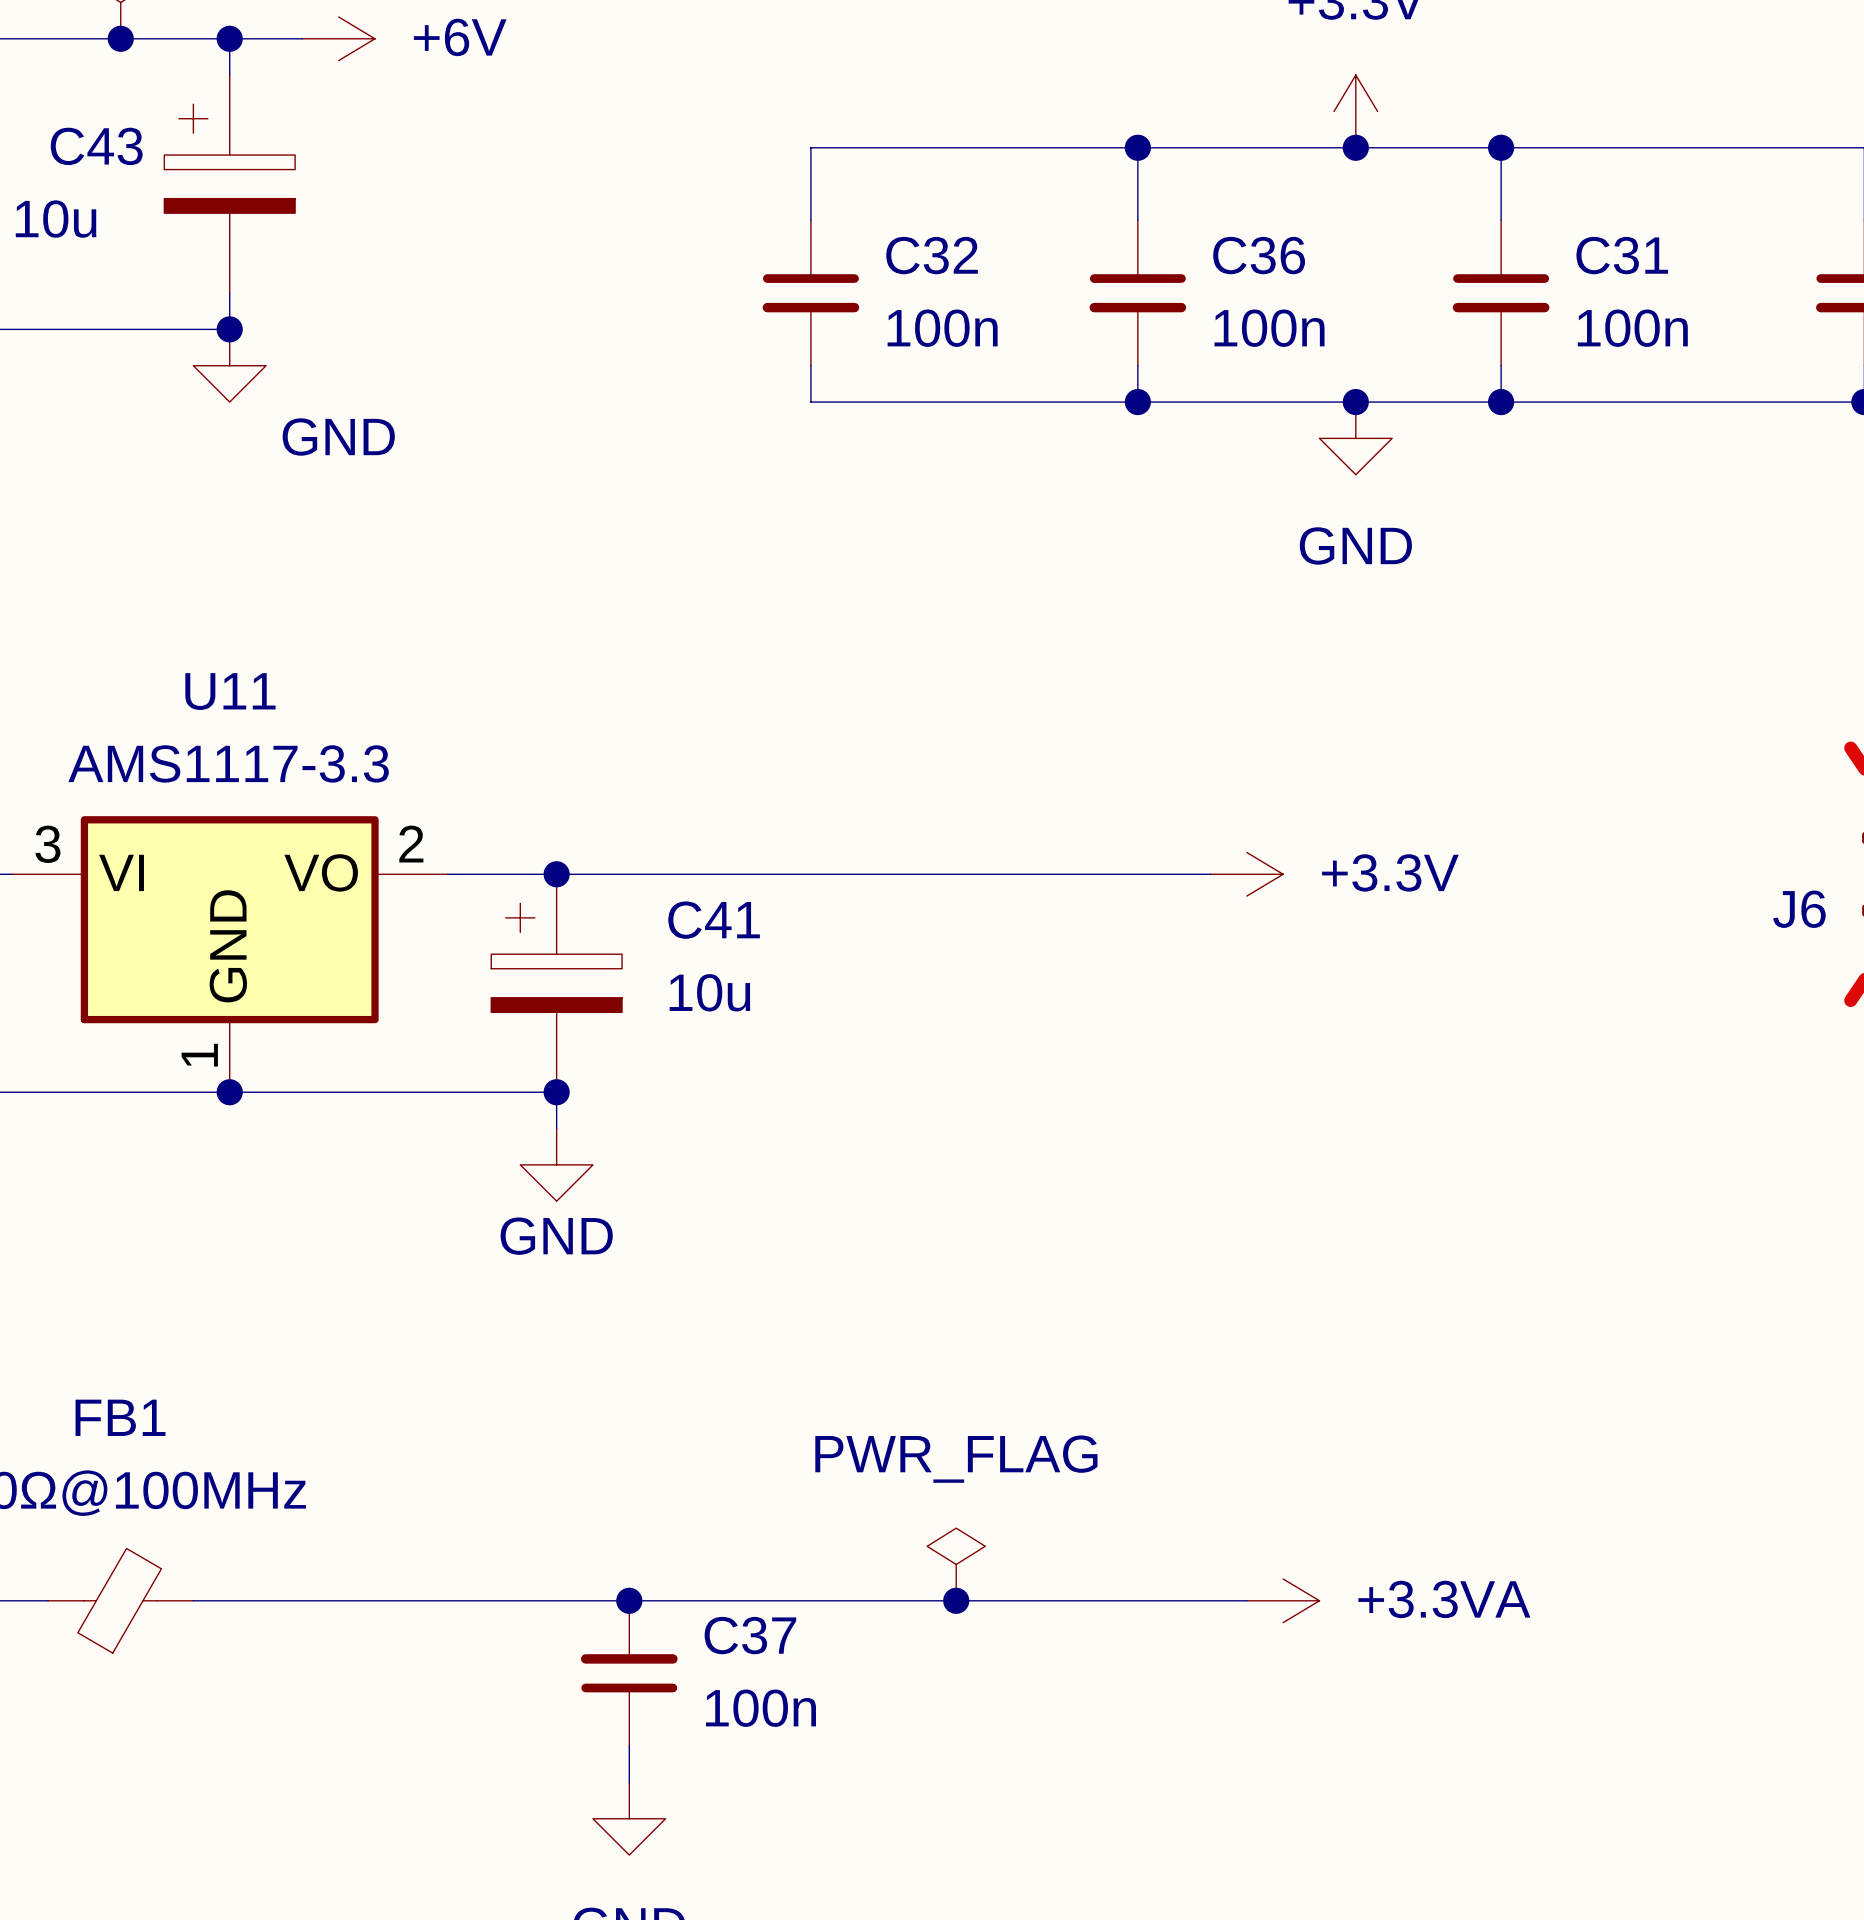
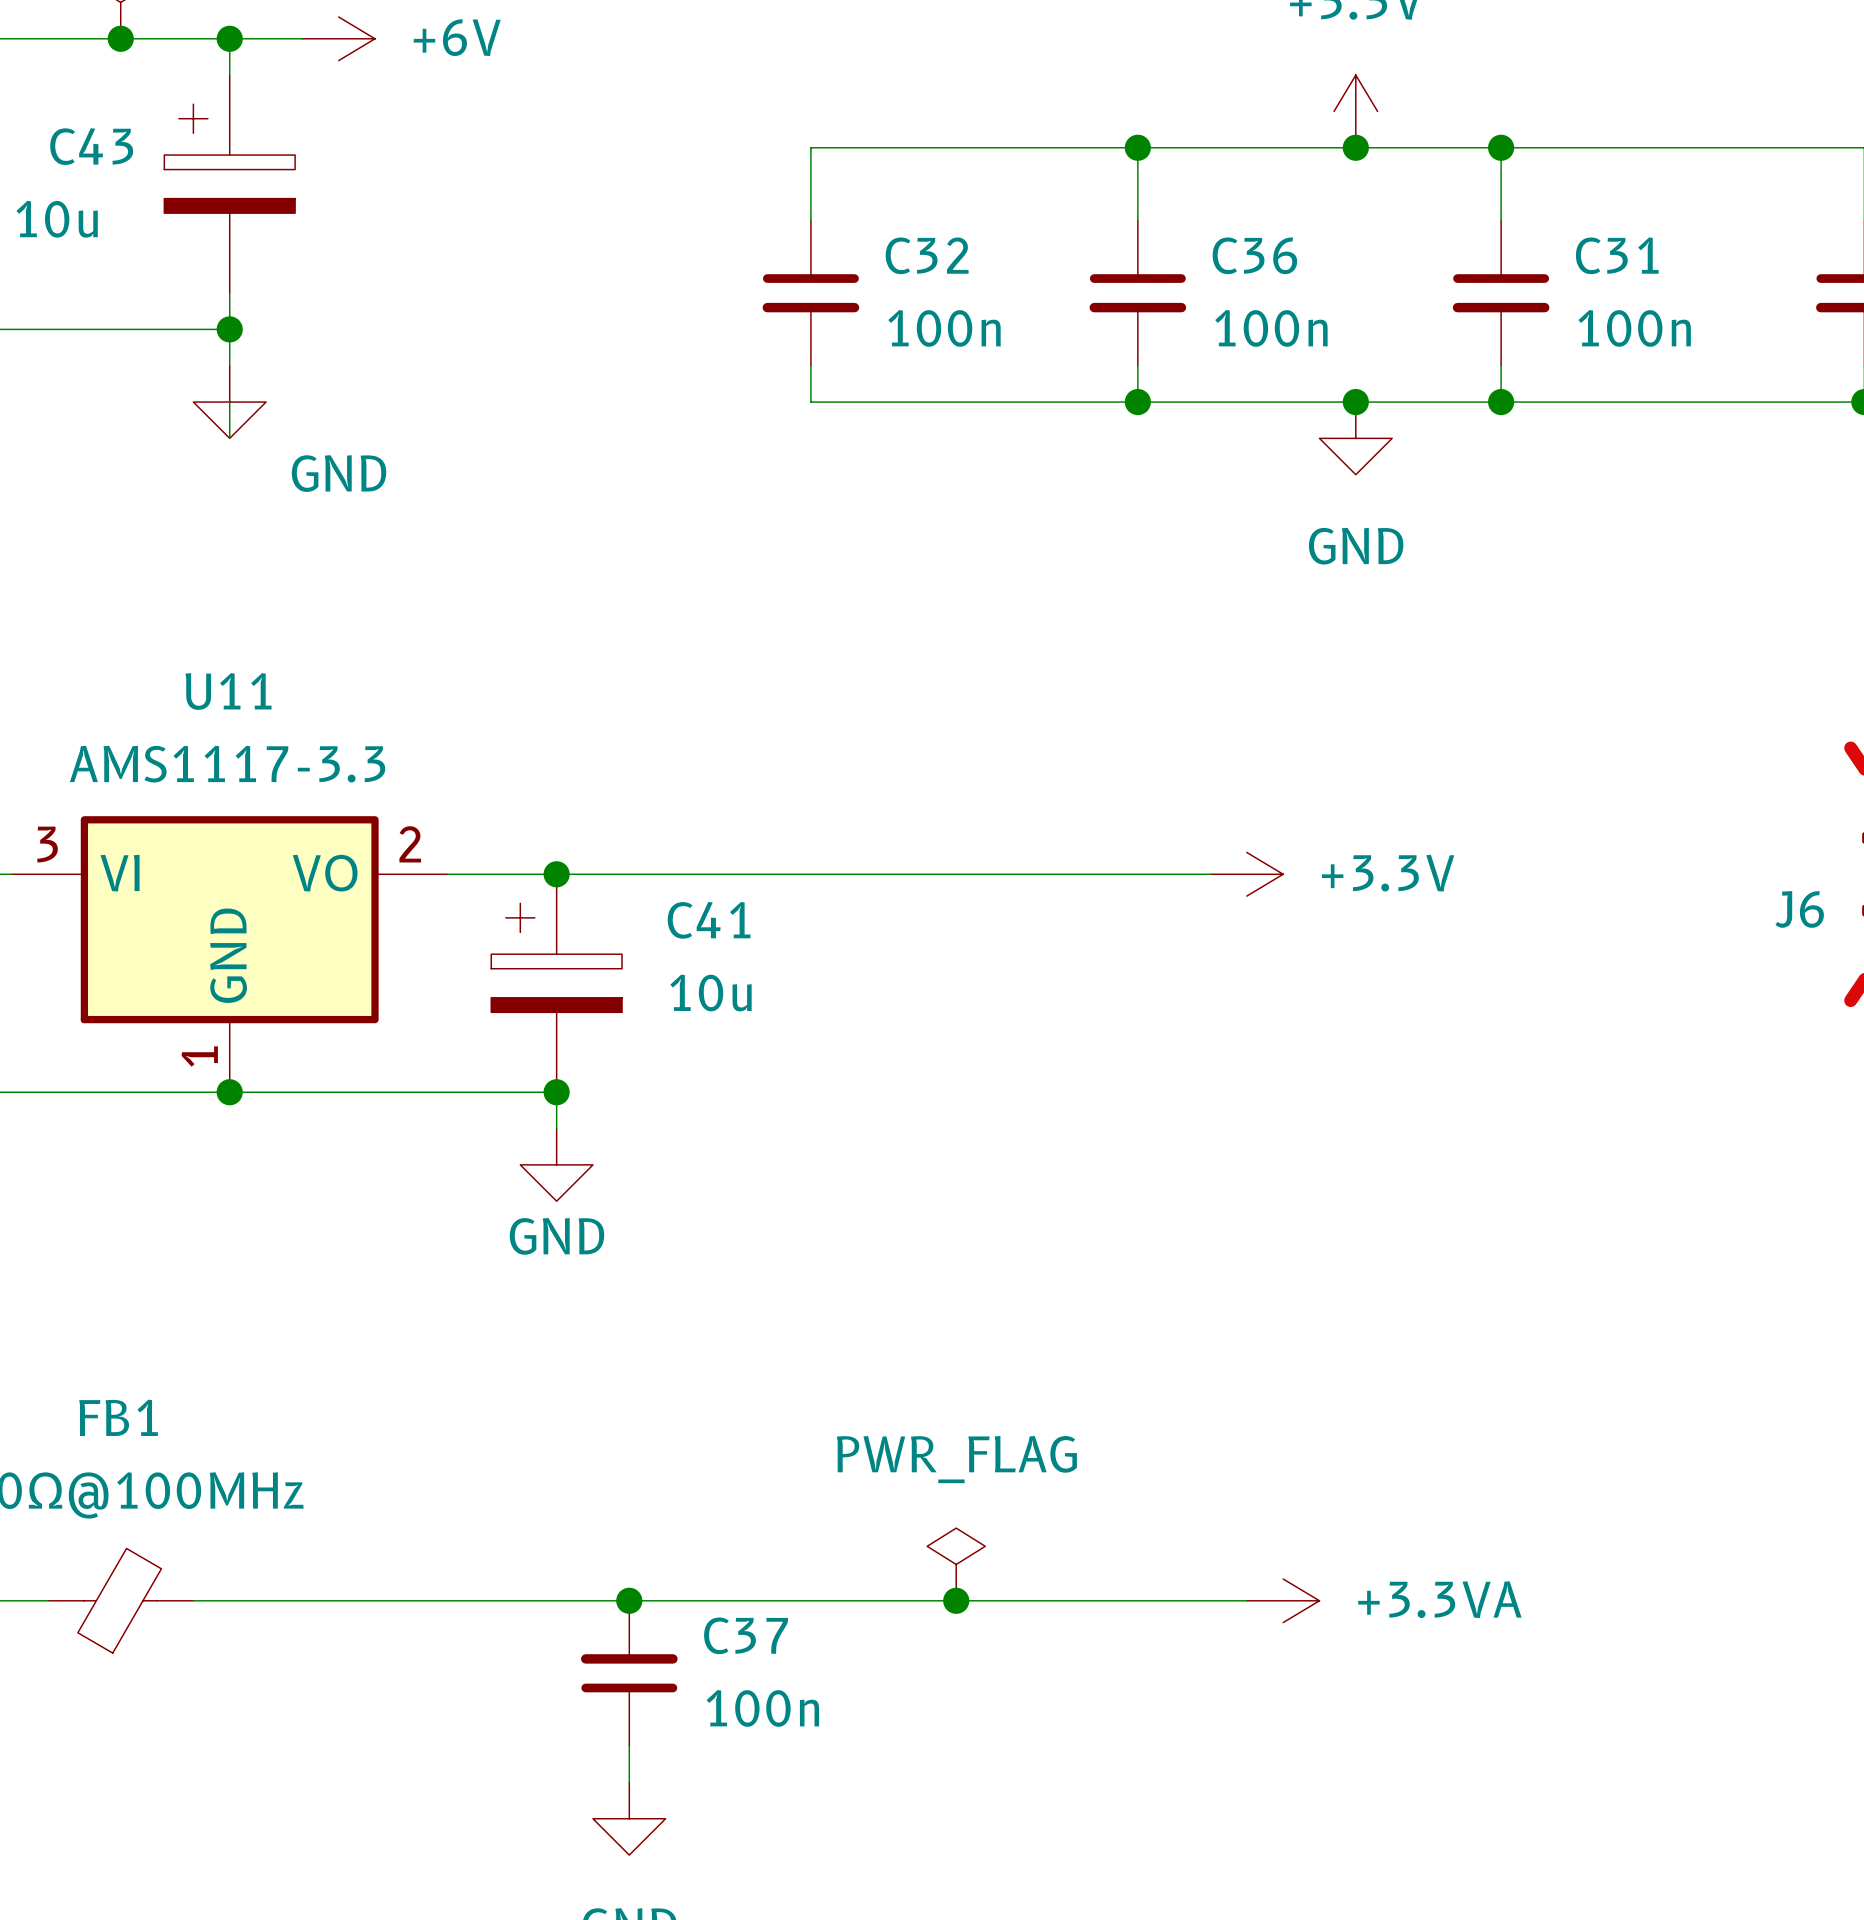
power symbol position: GND (229, 365) -> GND (229, 402)
wire: none -> (229, 402) (229, 438)

